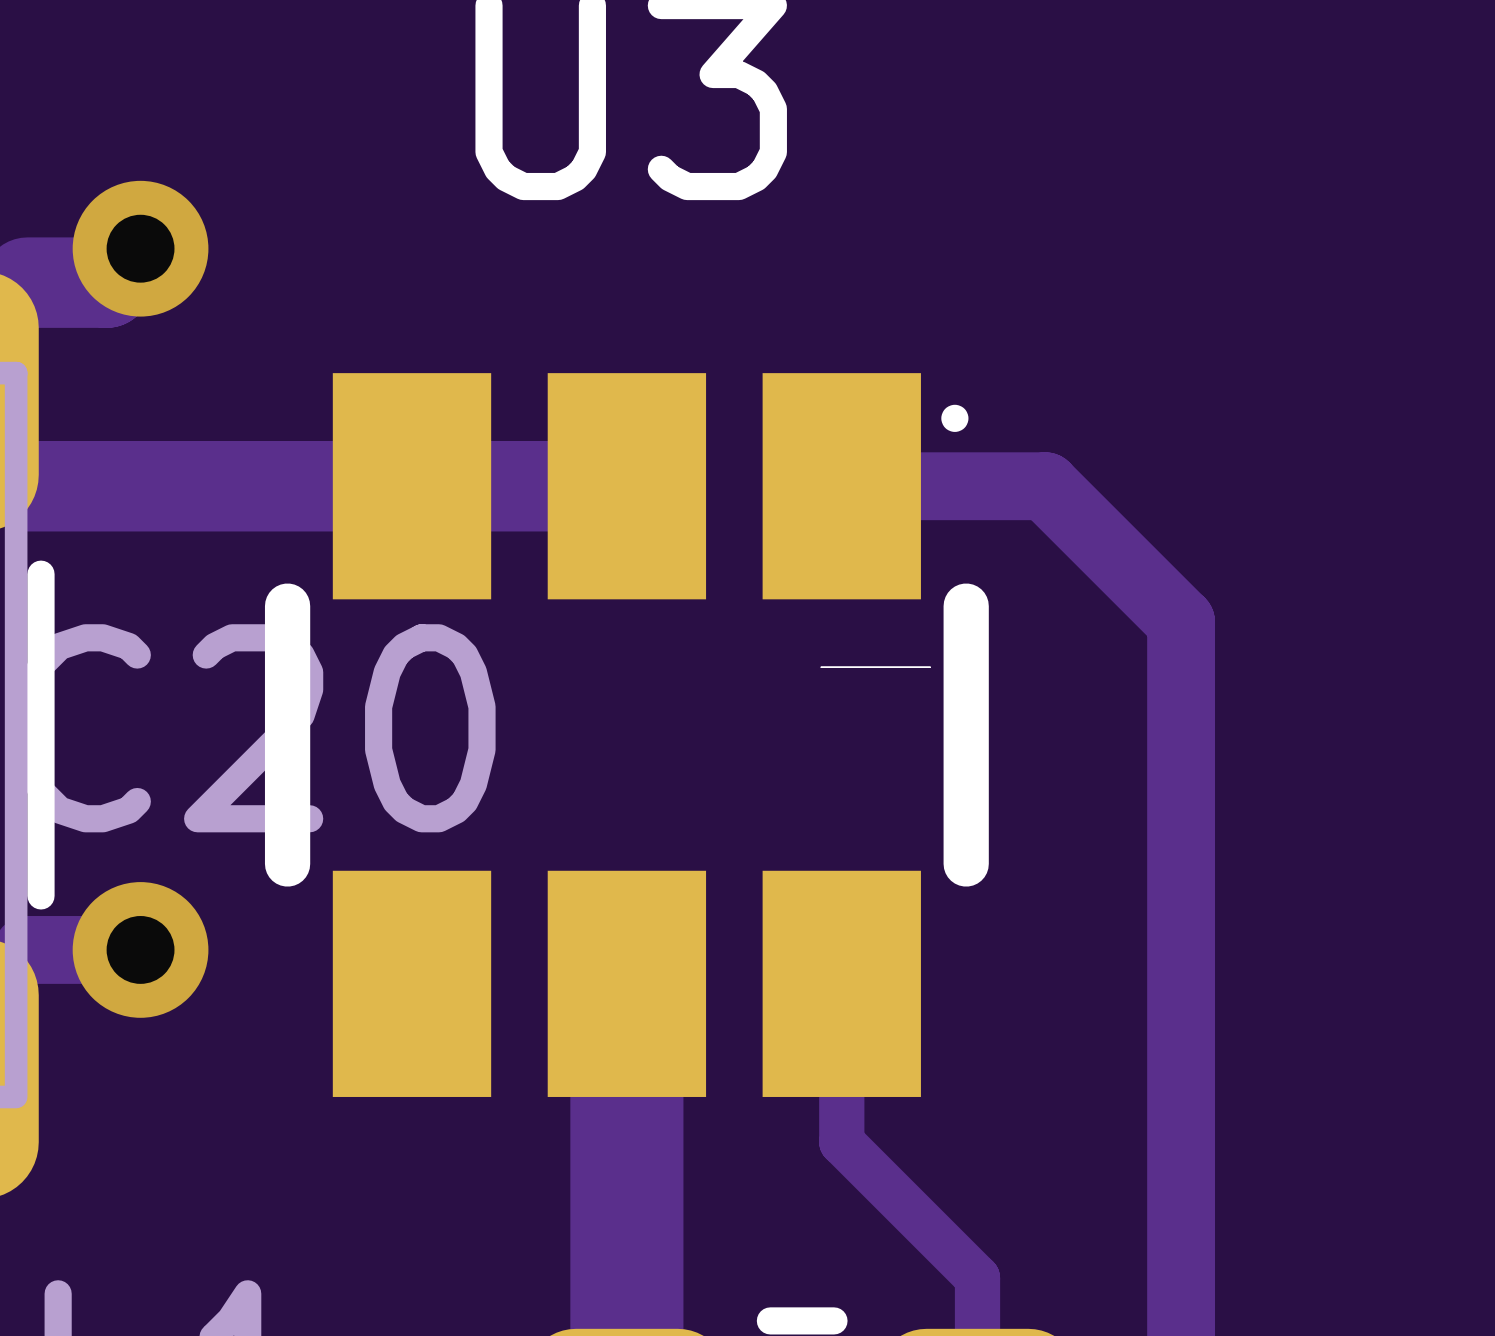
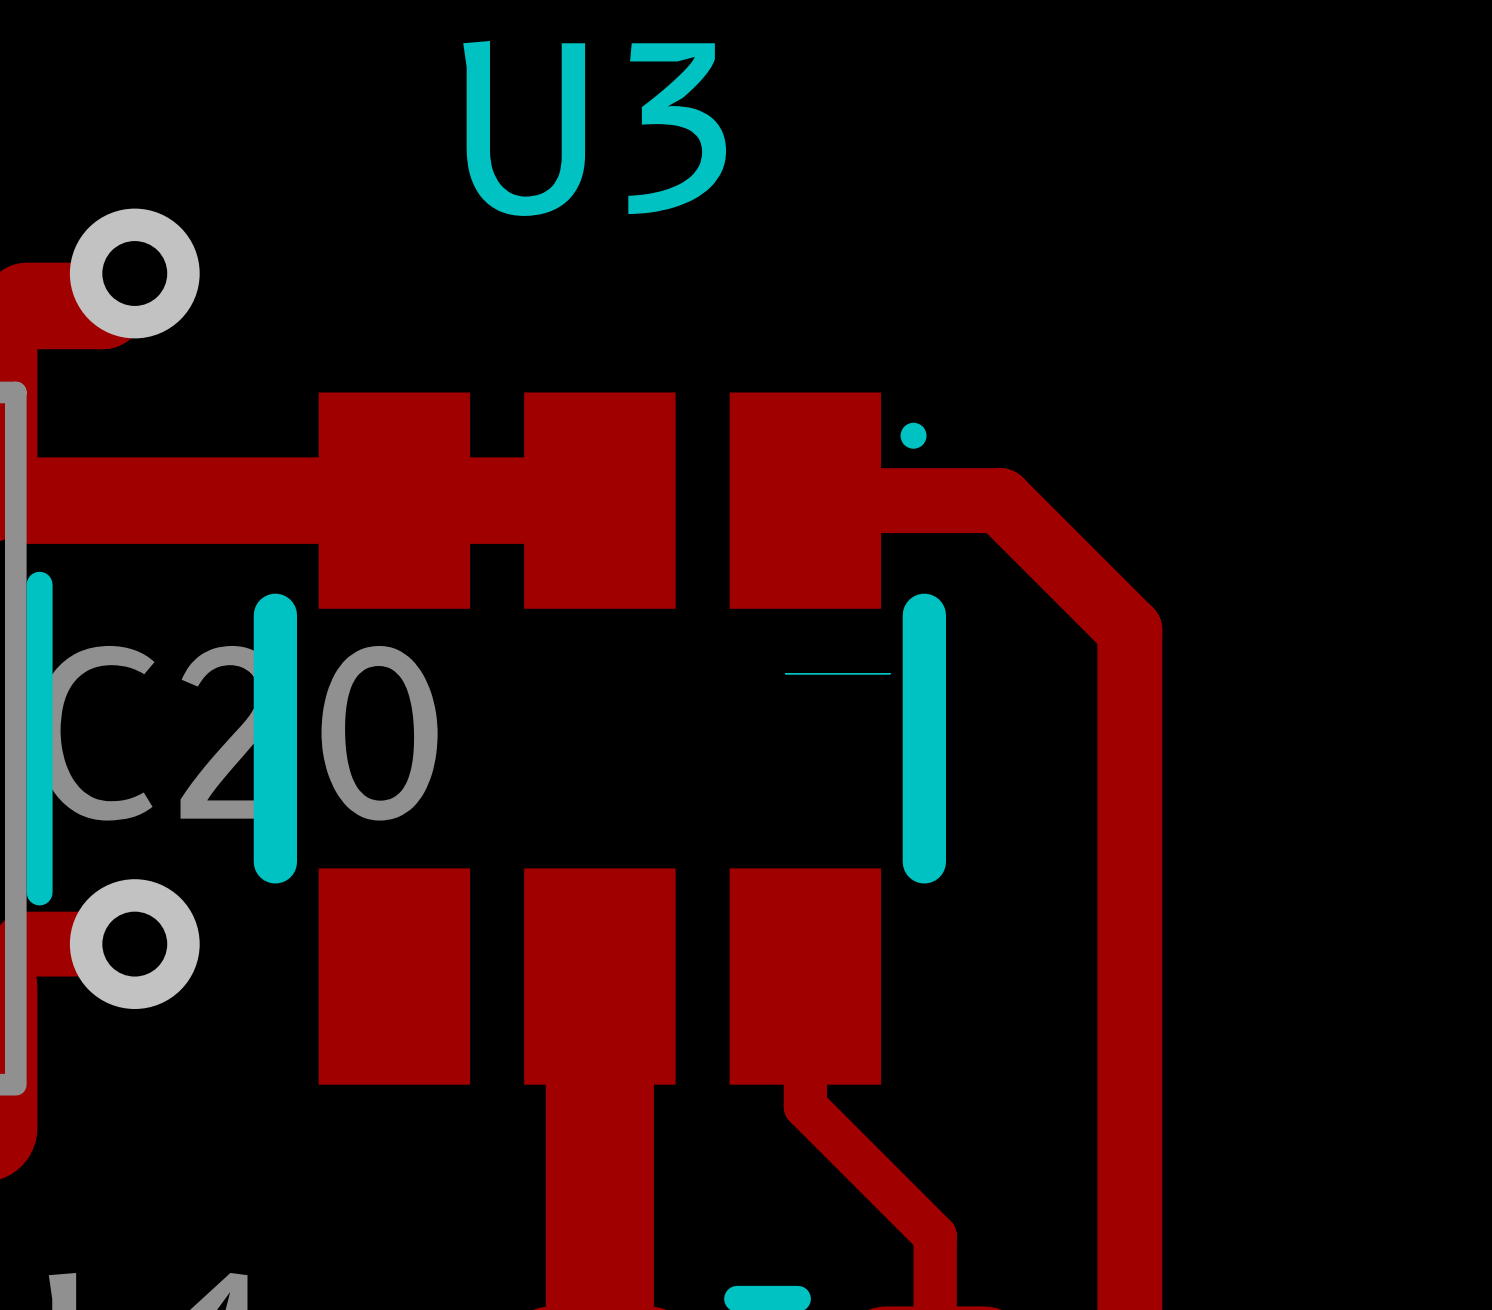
track: (841, 1119) (841, 1142) (977, 1277) -> (805, 1106) (935, 1236) (935, 1257)

